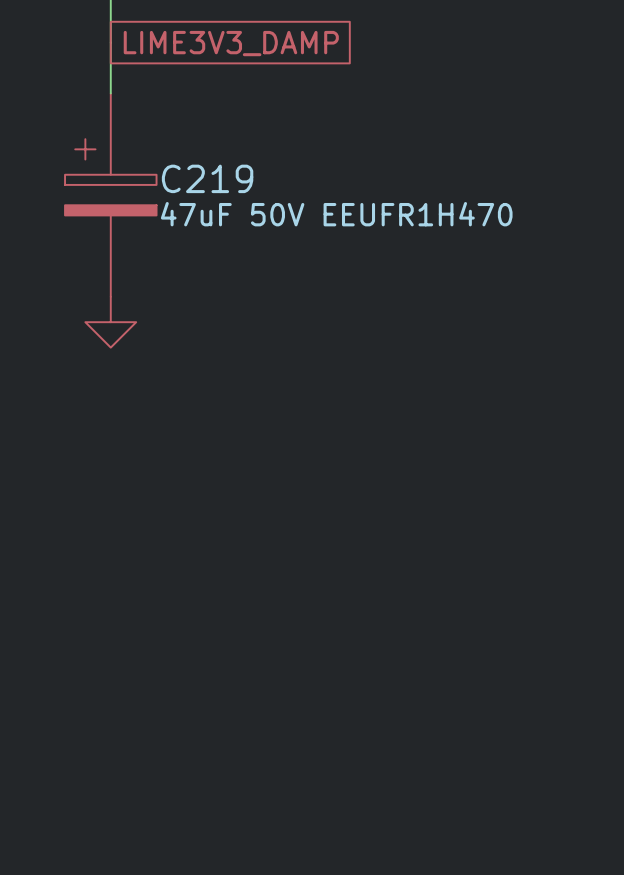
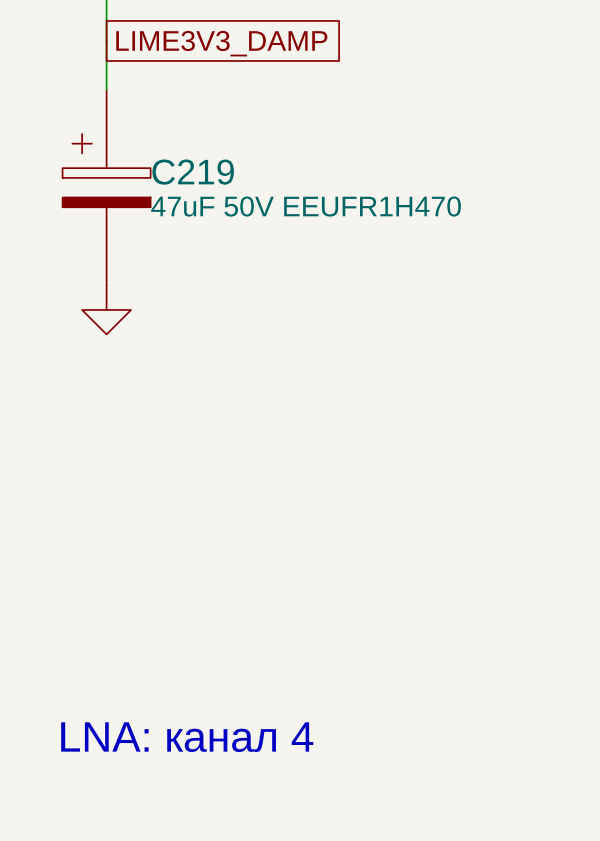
text: none -> LNA: канал 4 (187, 737)

